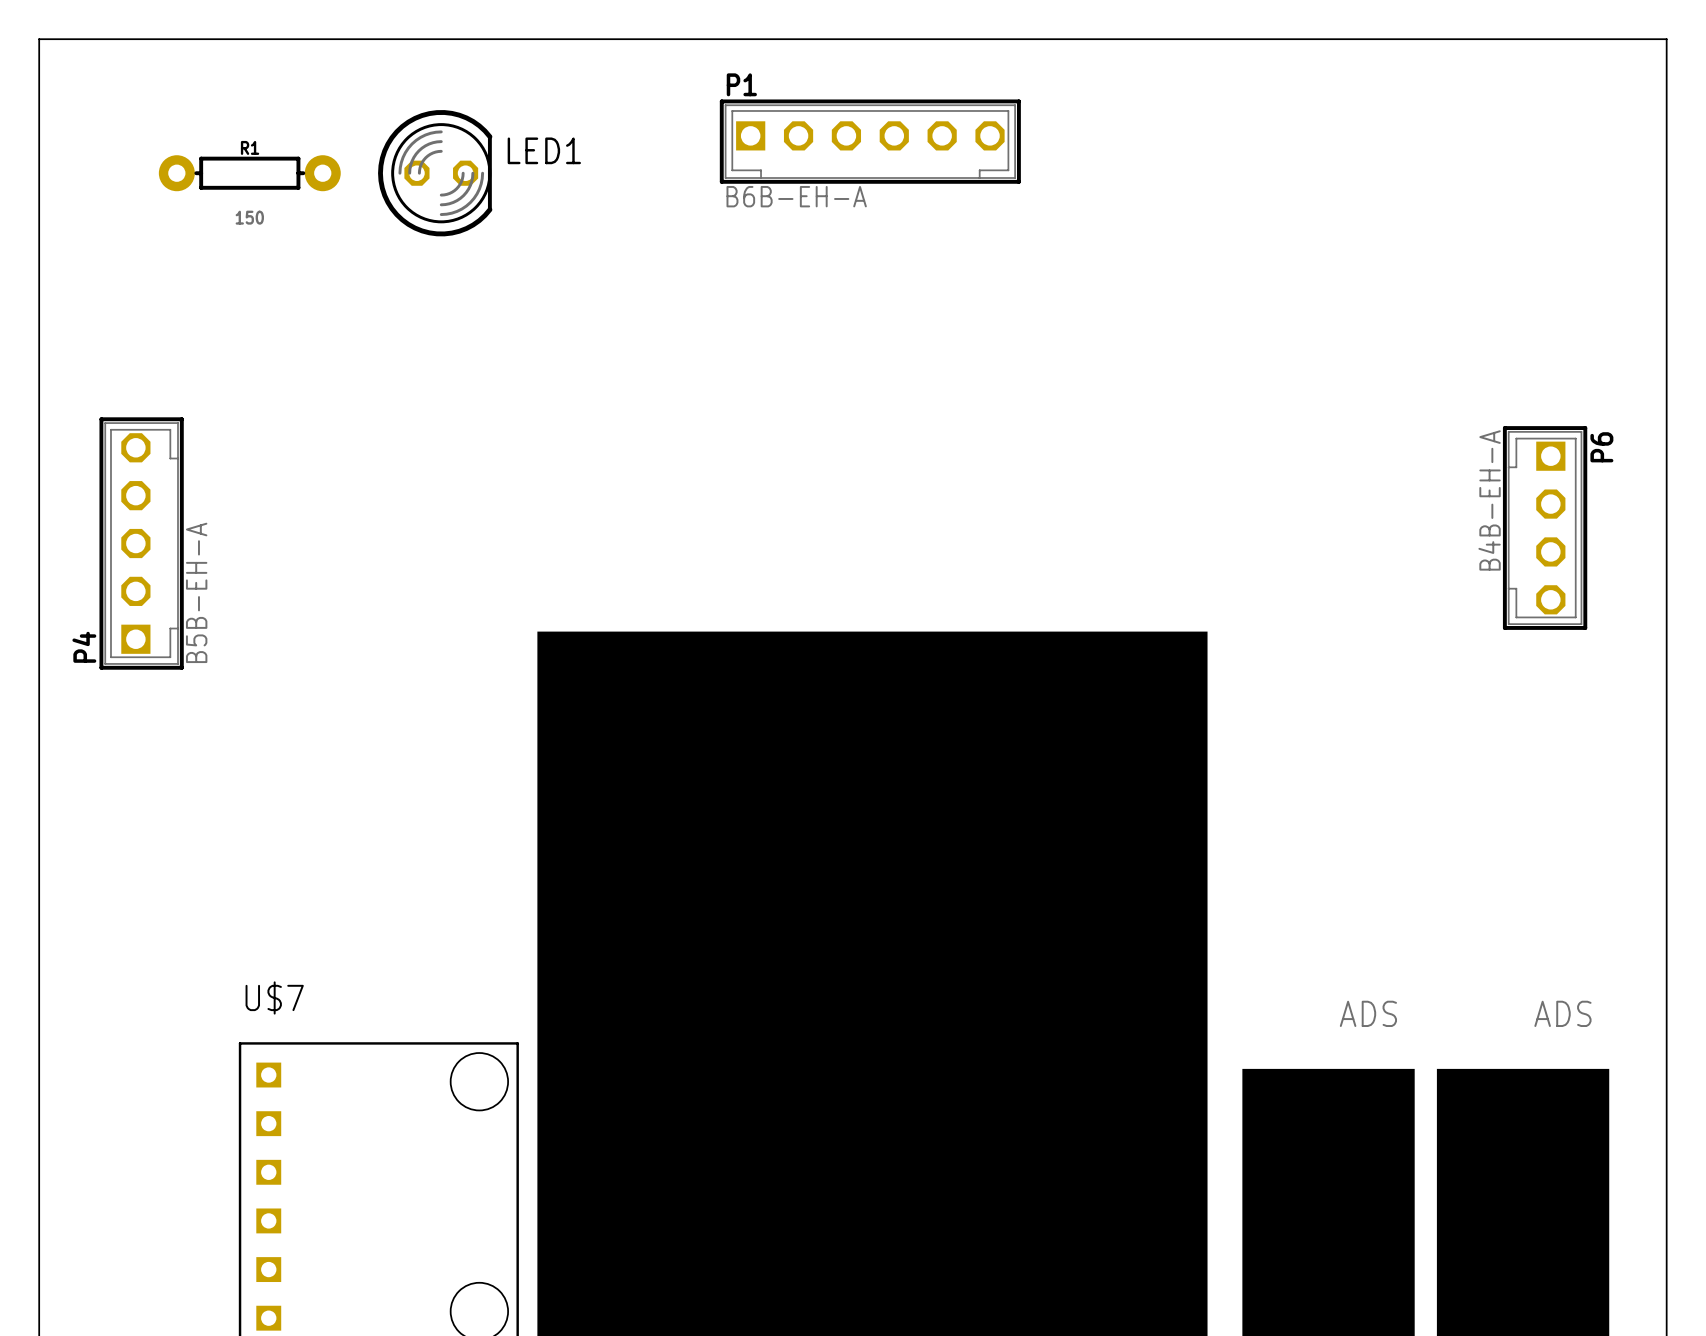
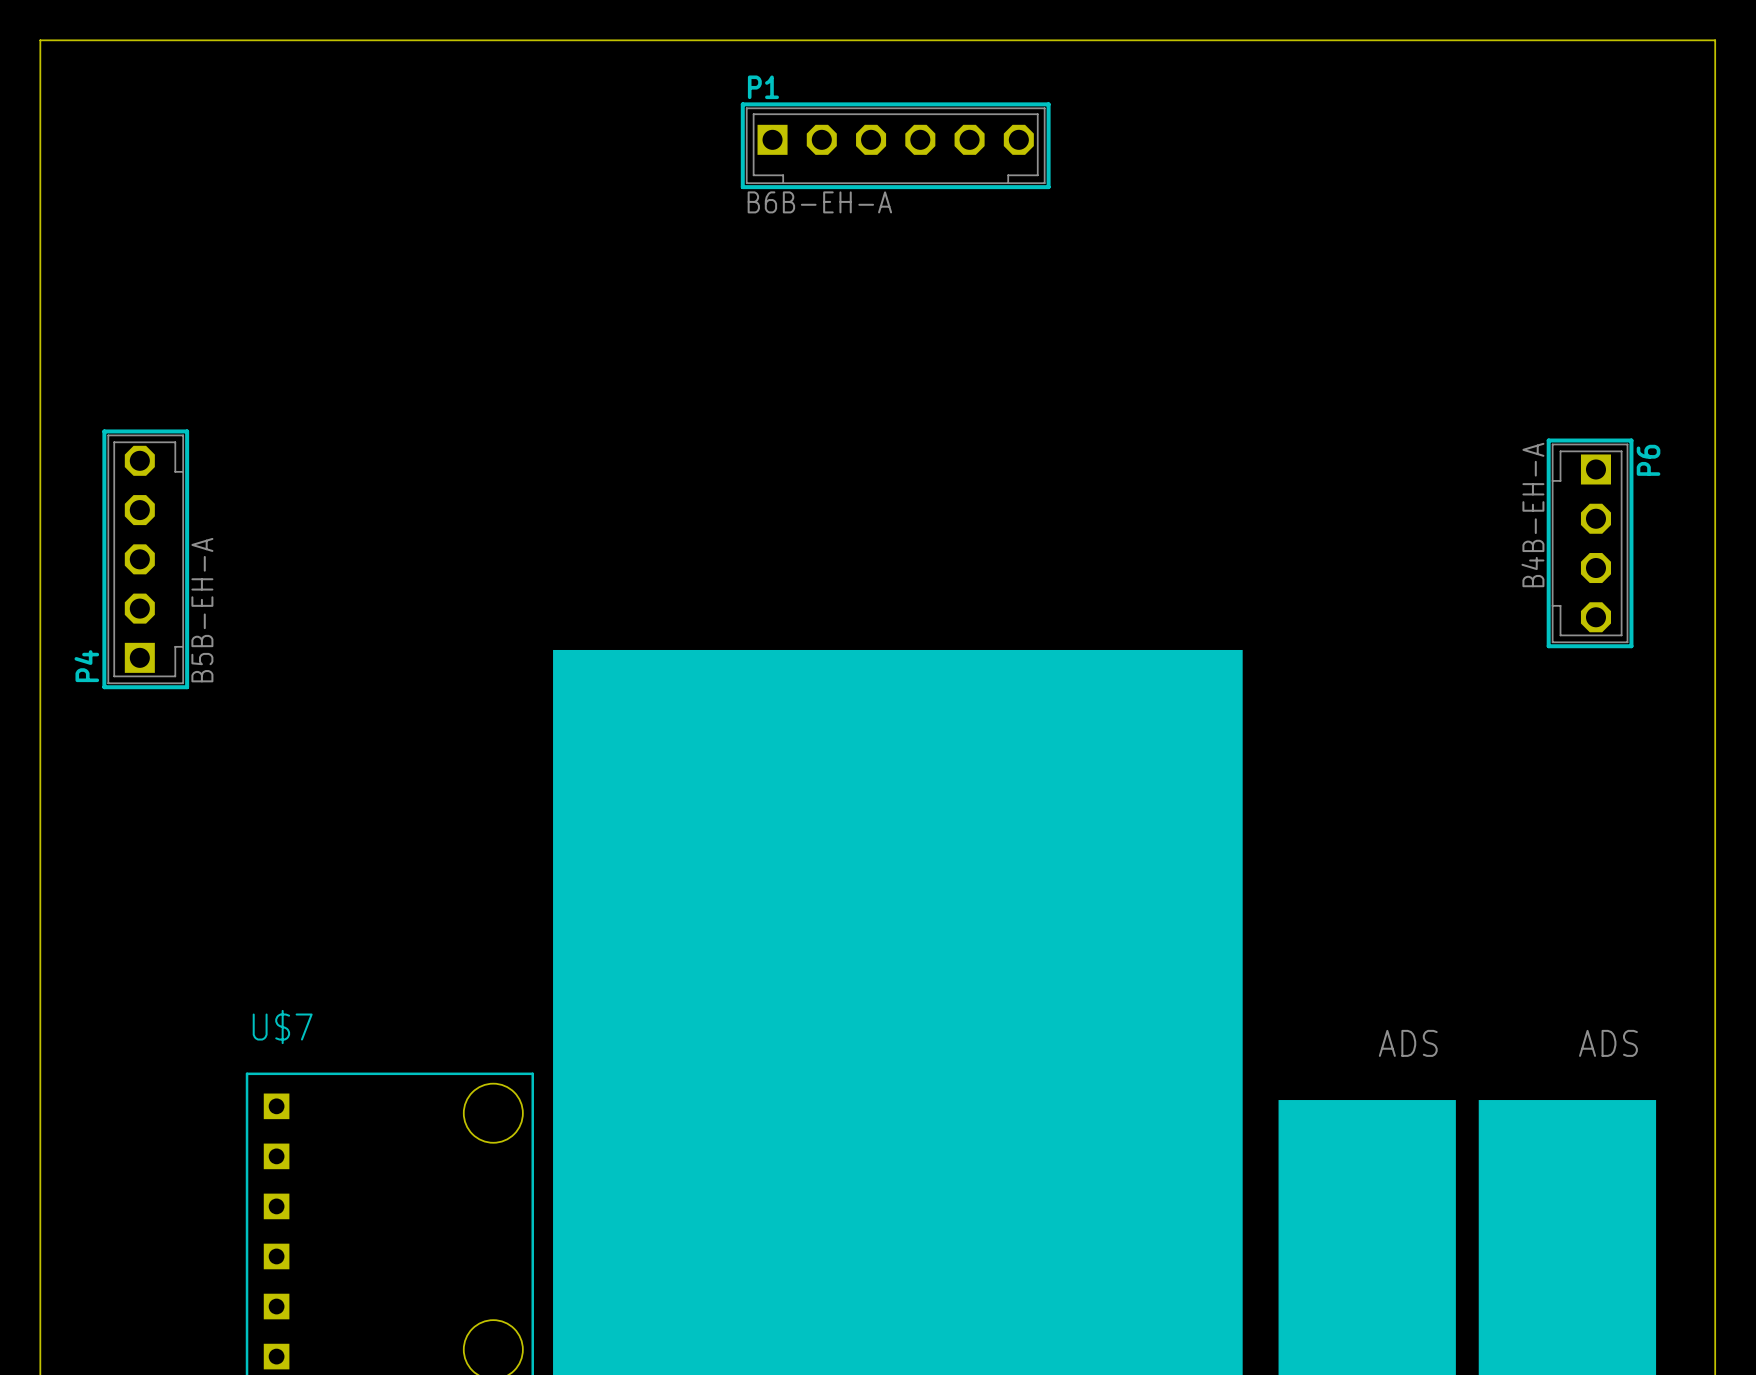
R1: 150 (249, 173) -> none
LED1: (435, 173) -> none

